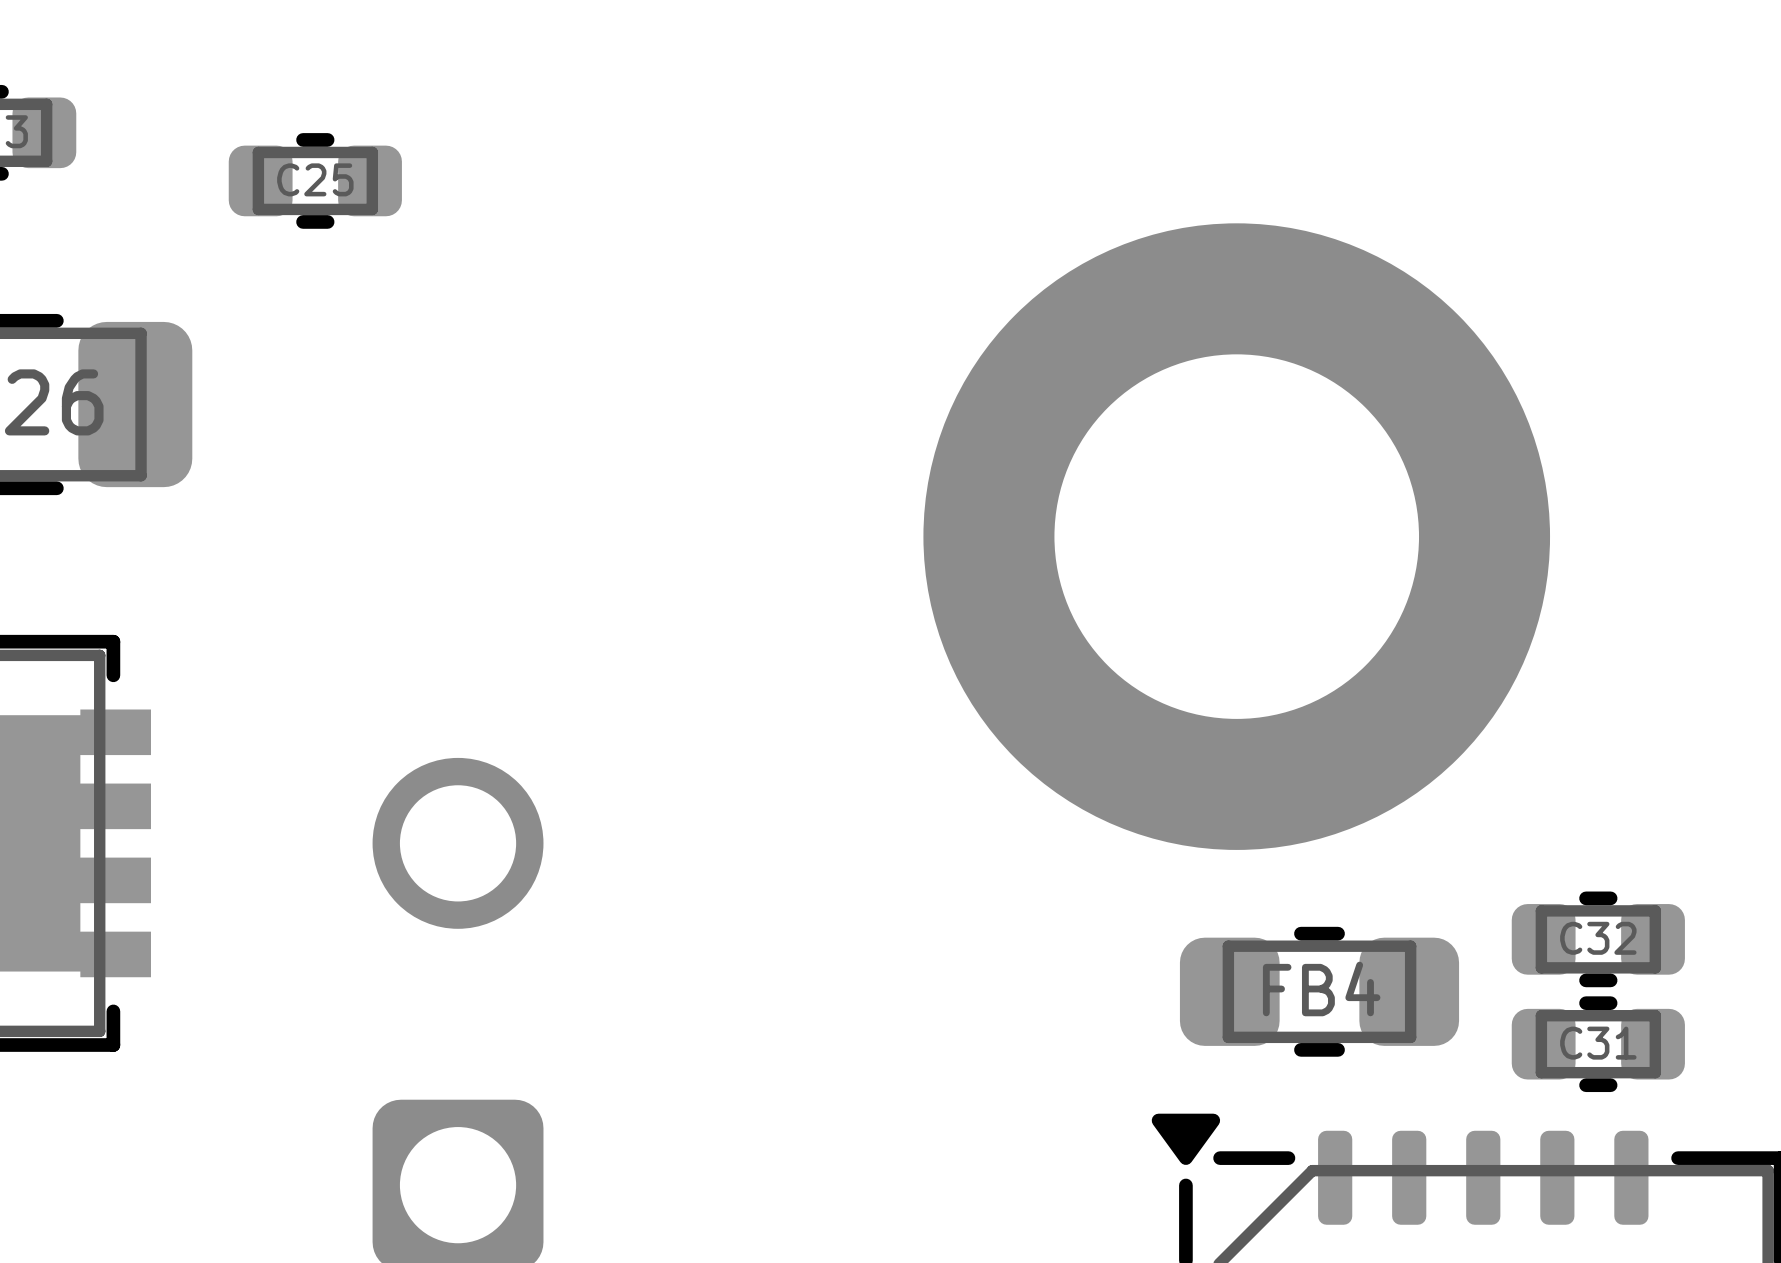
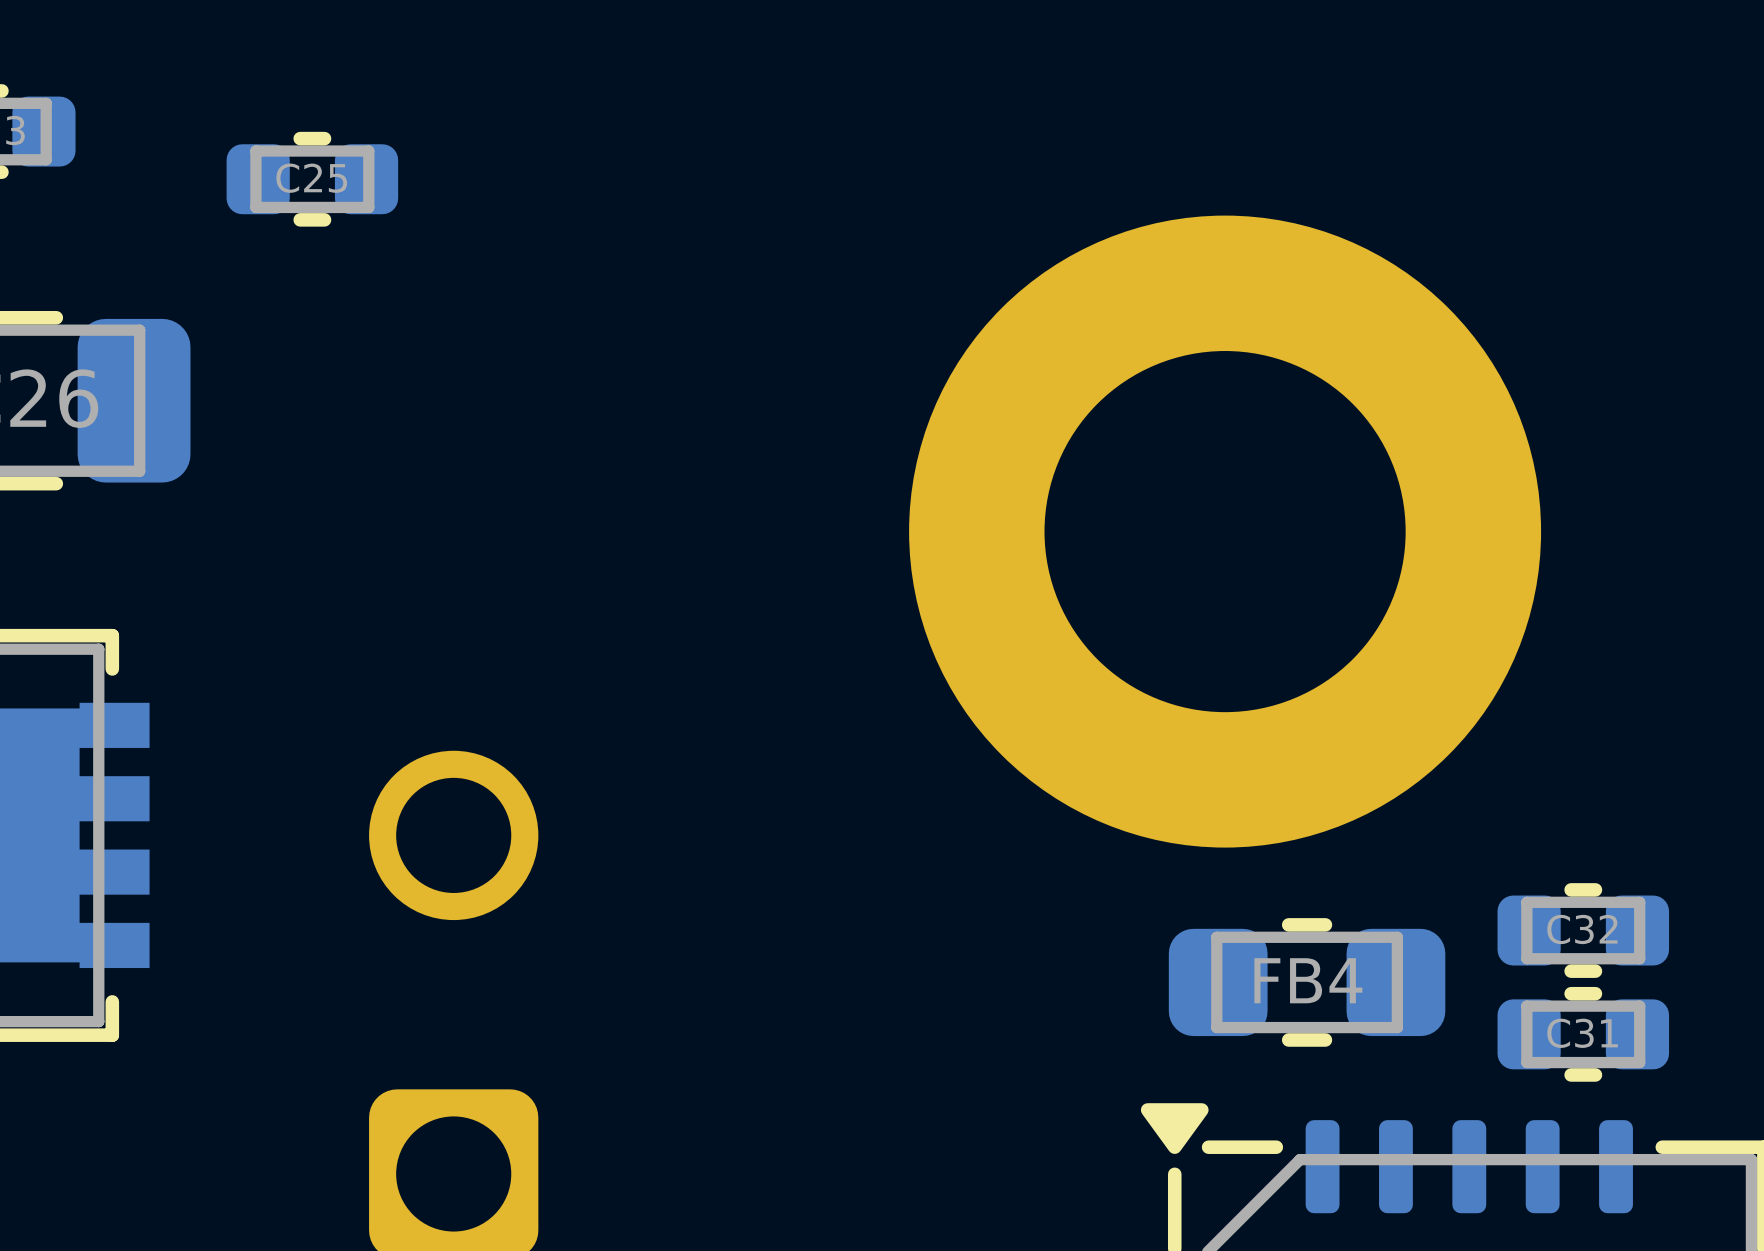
part footprint: [923, 223, 1551, 850] -> [909, 215, 1542, 848]

